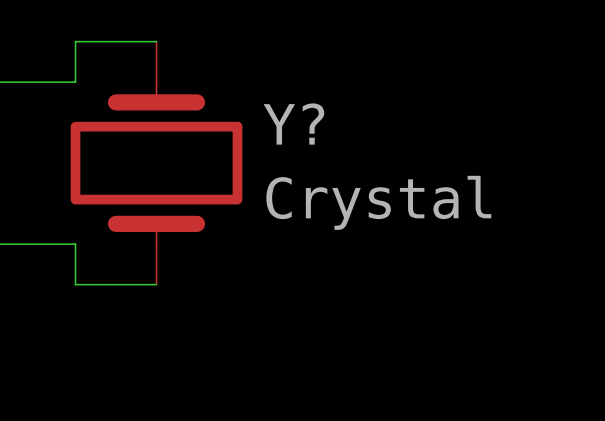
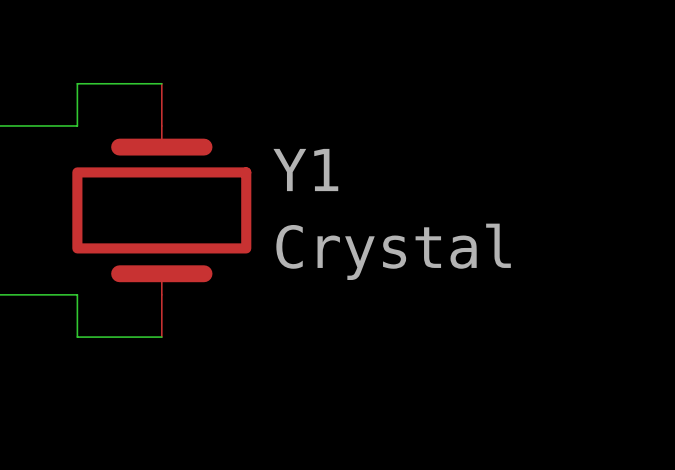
Y? name: Y? (293, 124) -> Y1 (305, 170)

